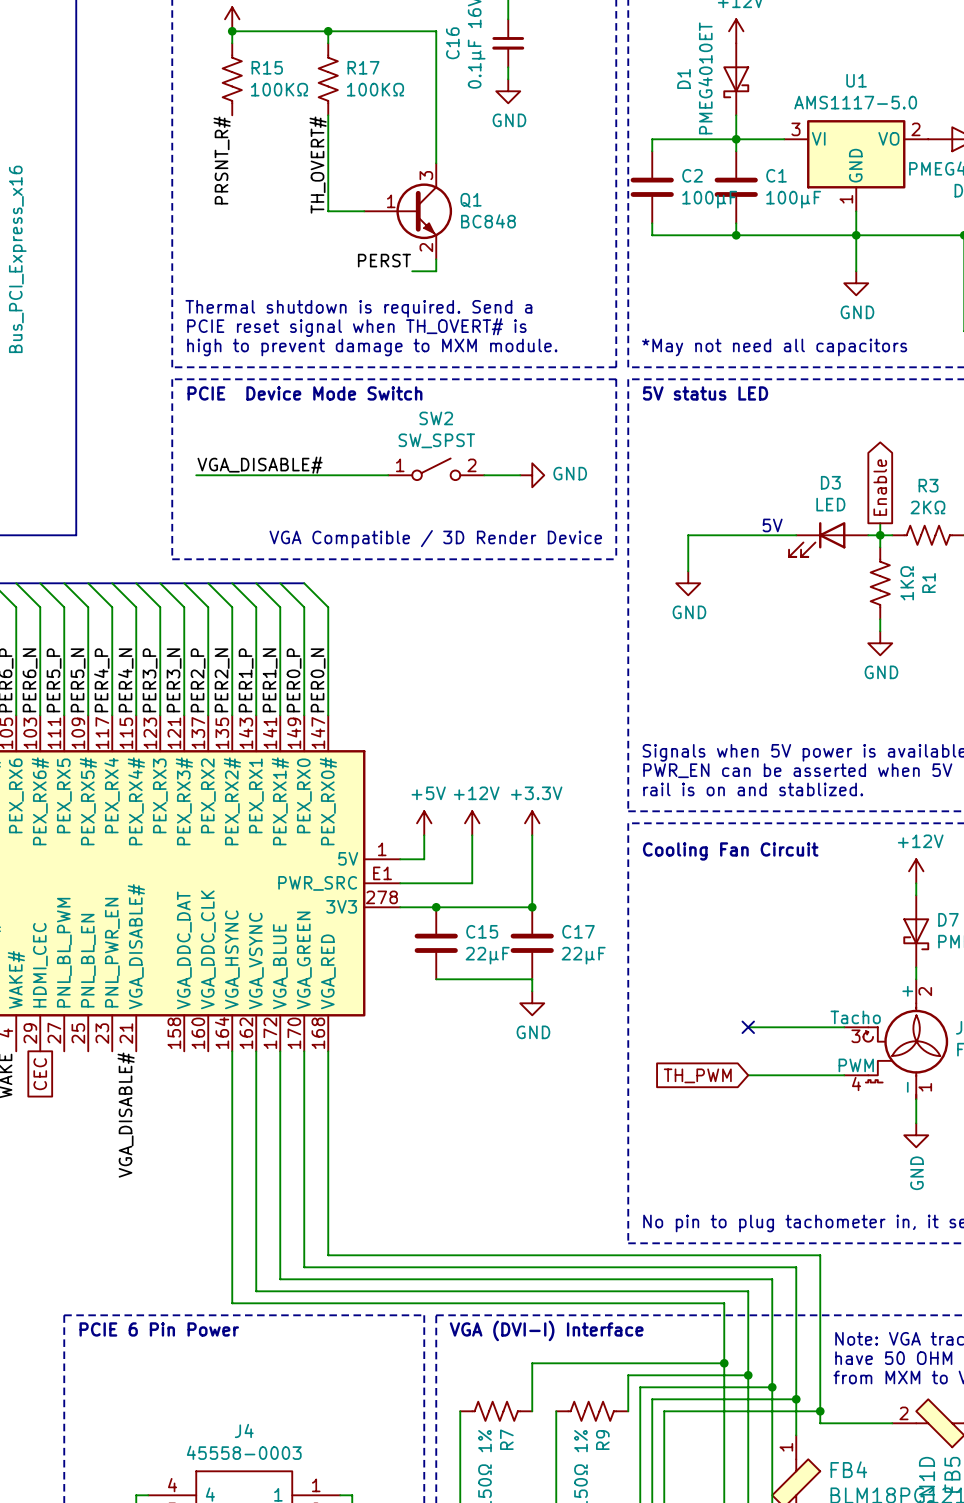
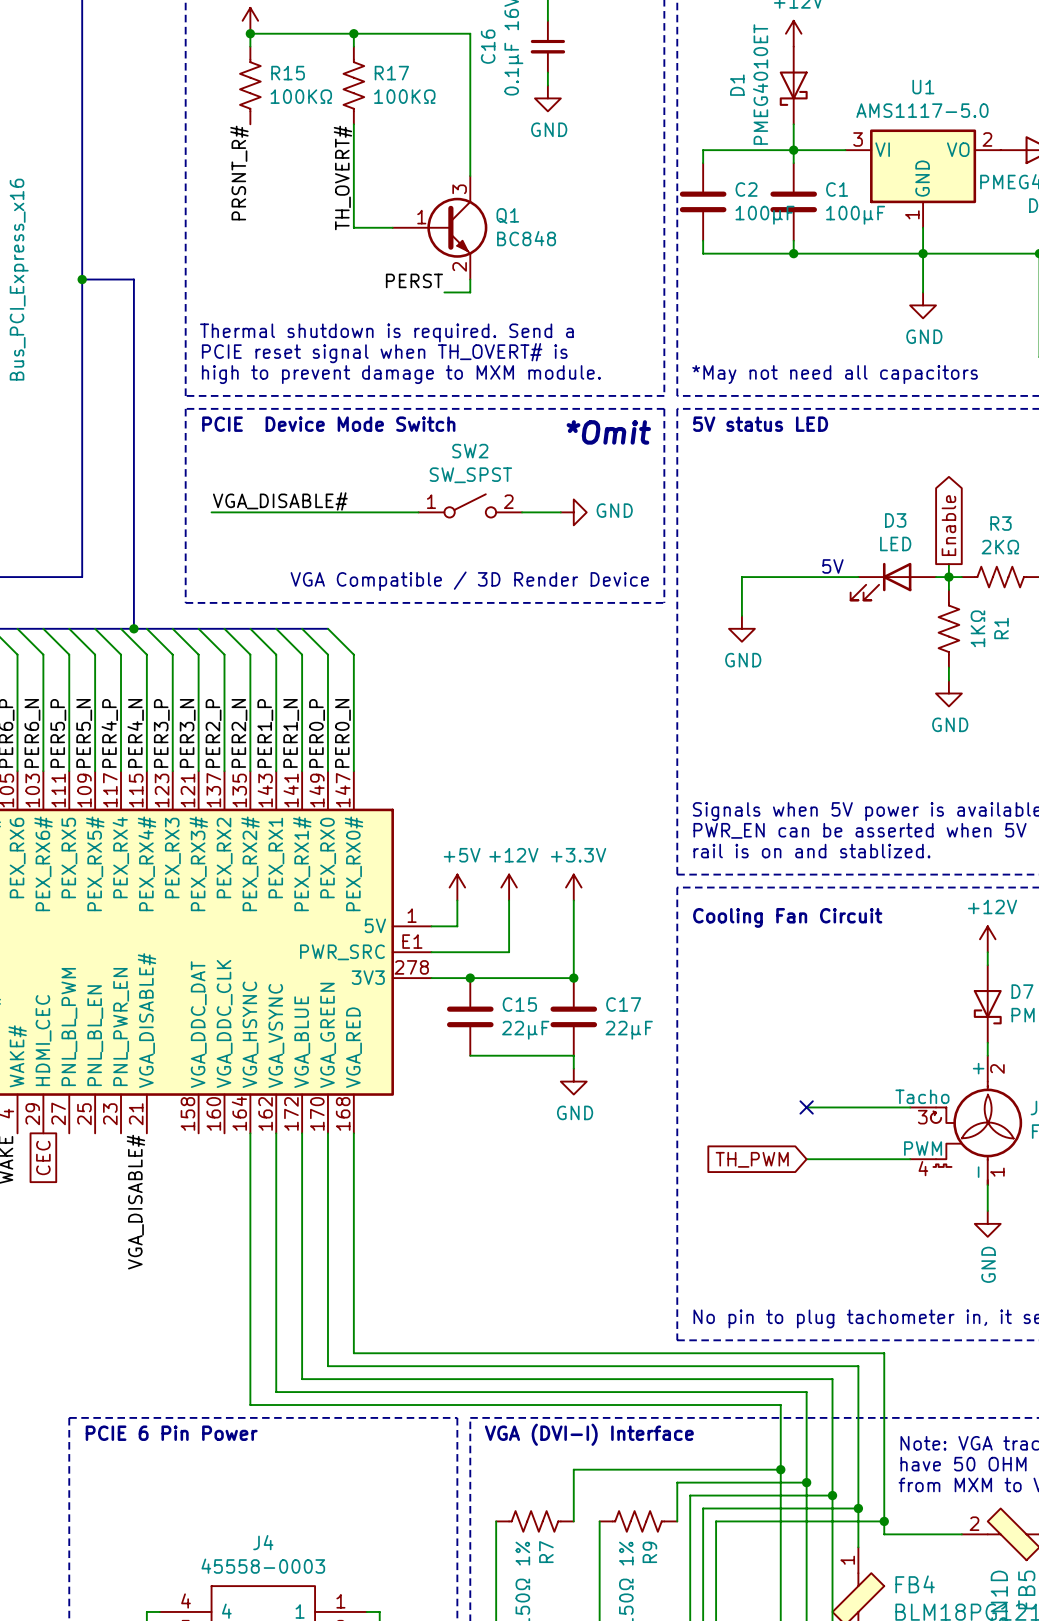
bus: none -> (82, 279) (133, 279) (133, 628)
junction: none -> (82, 279)
text: none -> *Omit (608, 432)
junction: none -> (133, 628)

